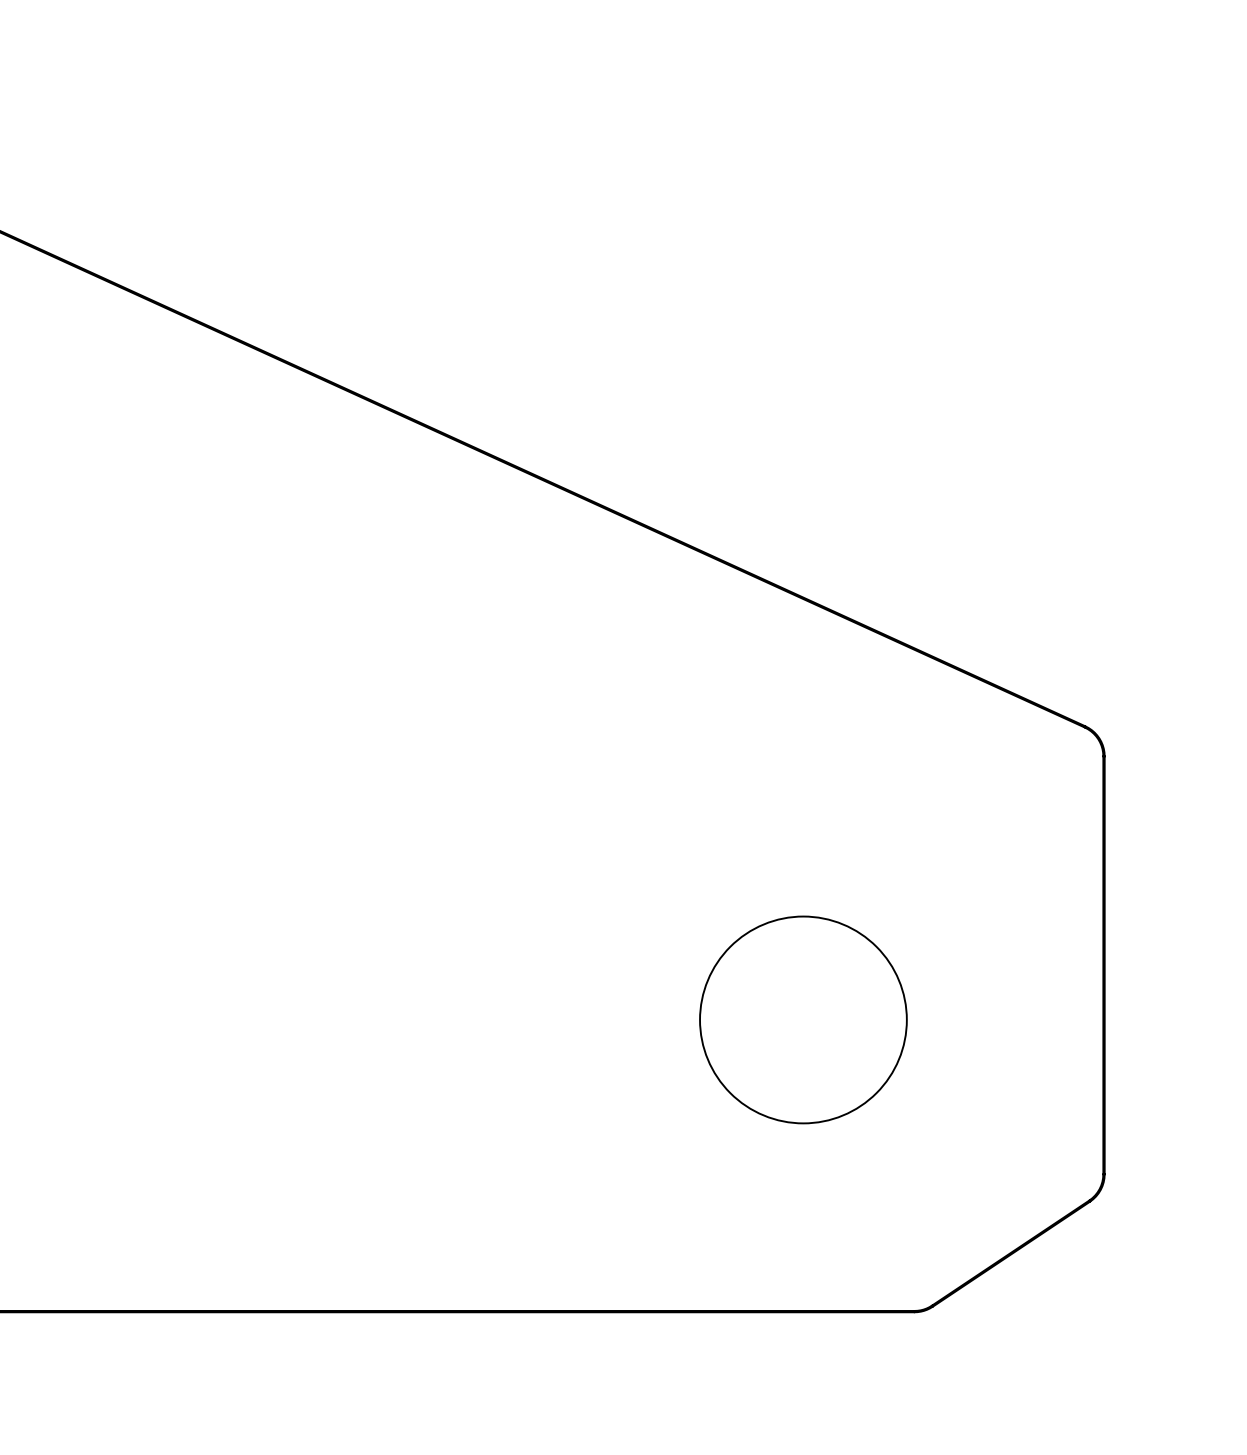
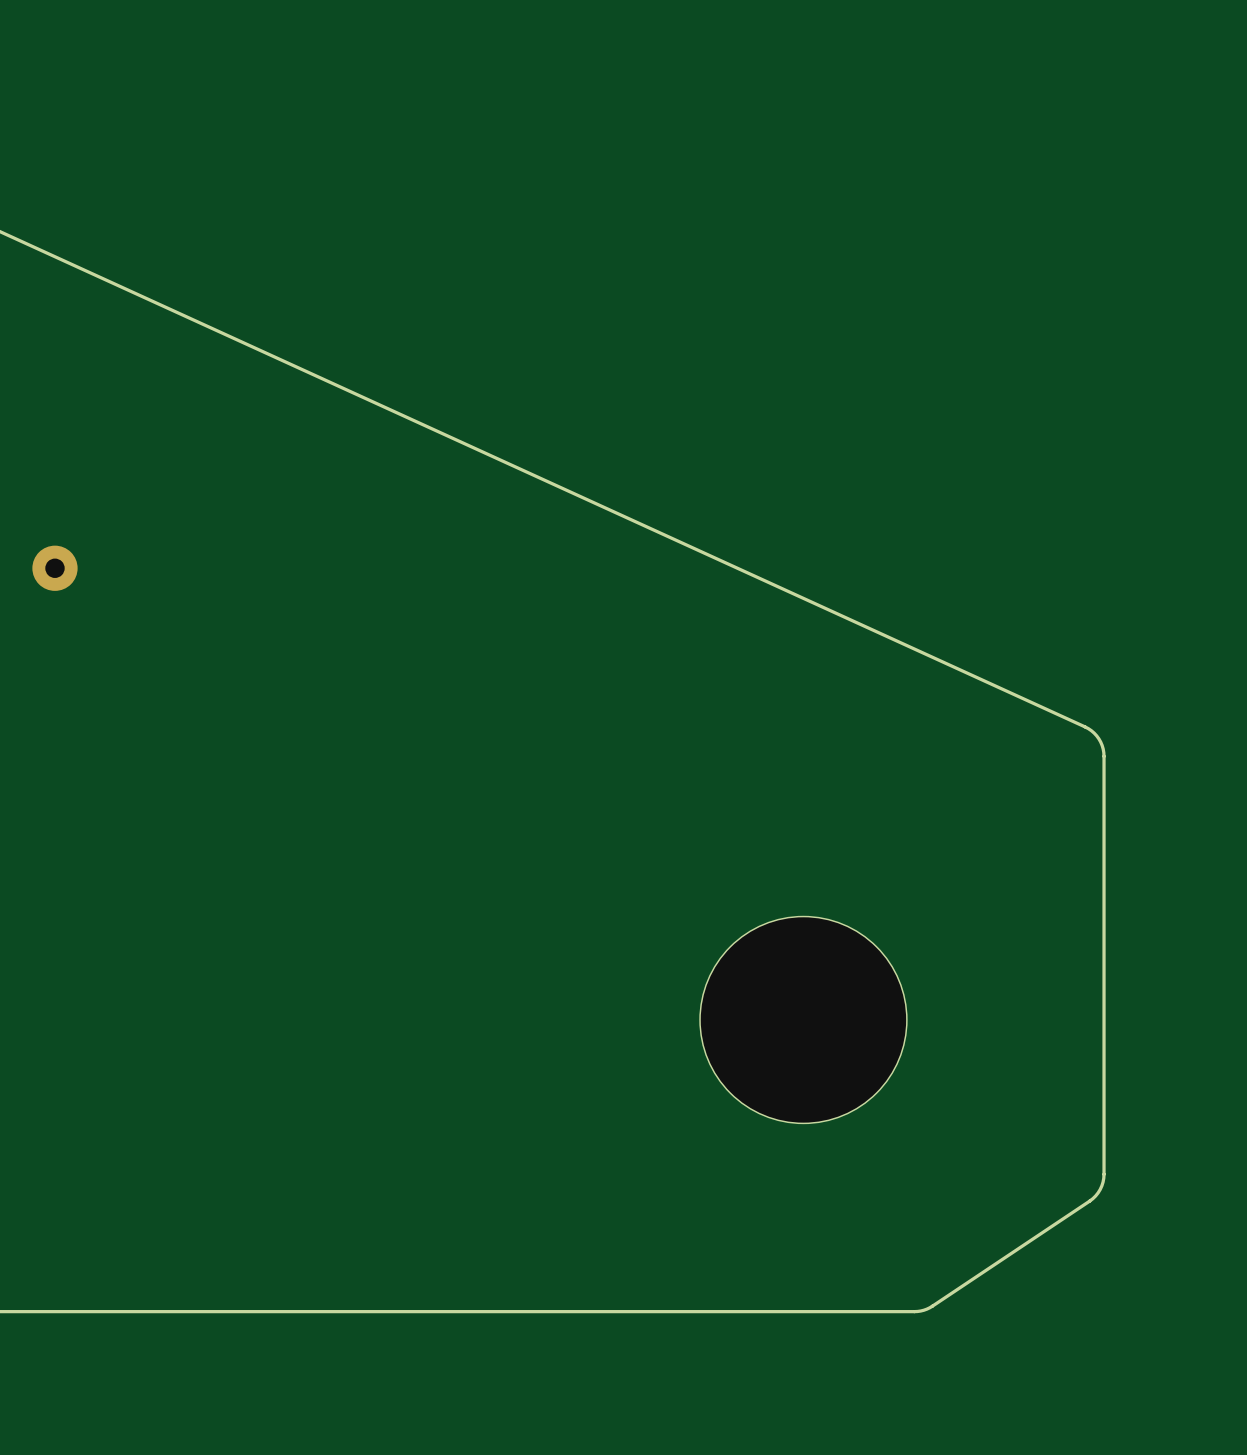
via: none -> (54, 568)

